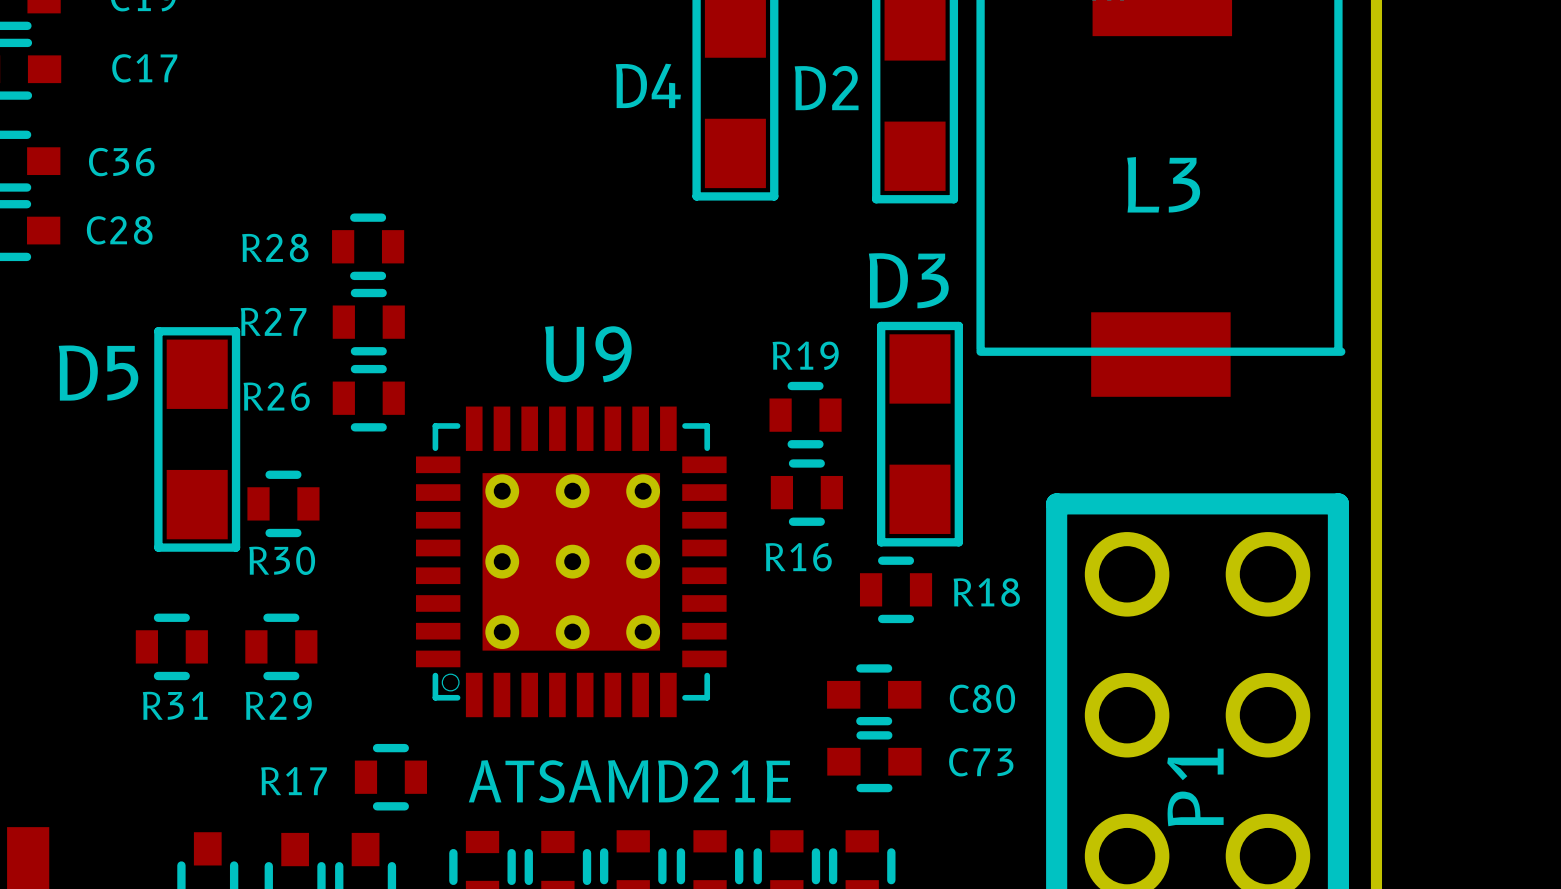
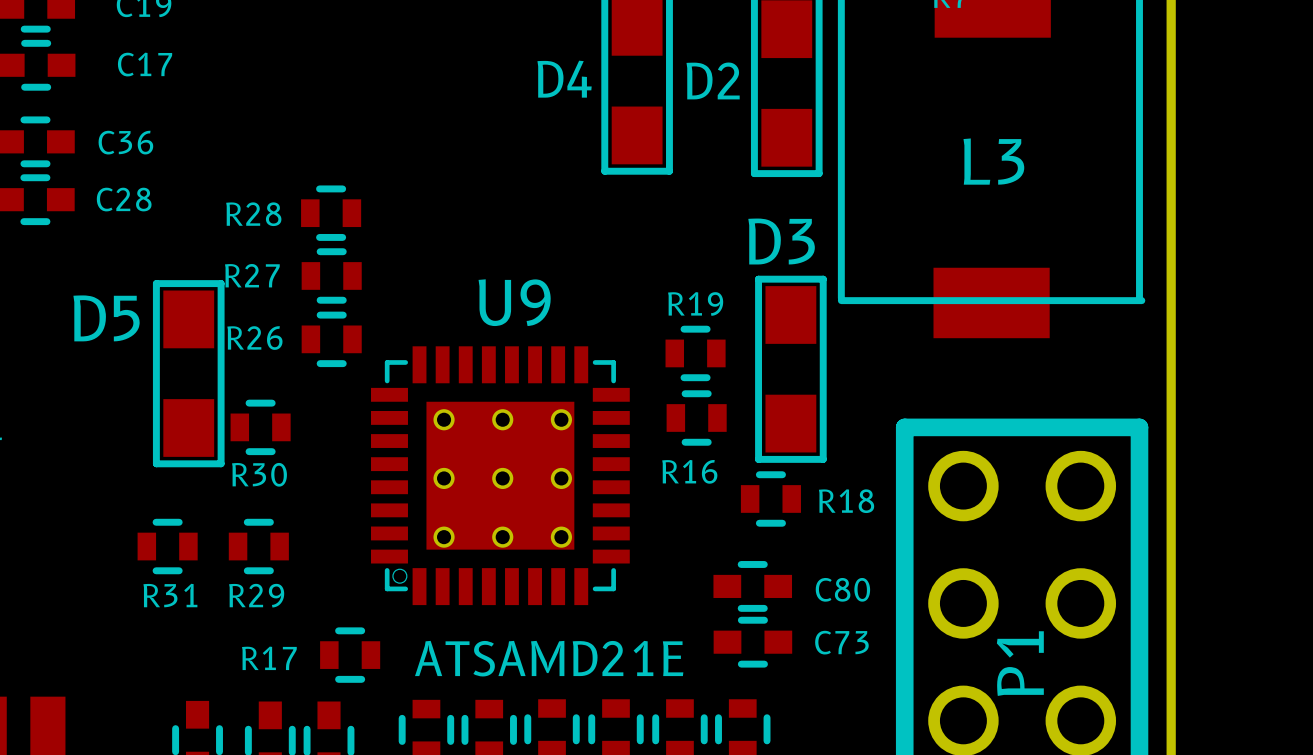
part footprint: [485, 474, 520, 509] -> [433, 409, 455, 431]
part footprint: [555, 474, 590, 509] -> [492, 409, 514, 431]
part footprint: [626, 474, 661, 509] -> [550, 409, 572, 431]
part footprint: [485, 544, 520, 579] -> [433, 467, 455, 490]
part footprint: [555, 544, 590, 579] -> [492, 467, 514, 490]
part footprint: [626, 544, 661, 579] -> [550, 467, 572, 490]
part footprint: [485, 615, 520, 650] -> [433, 526, 455, 548]
part footprint: [555, 615, 590, 650] -> [492, 526, 514, 548]
part footprint: [626, 615, 661, 650] -> [550, 526, 572, 548]

